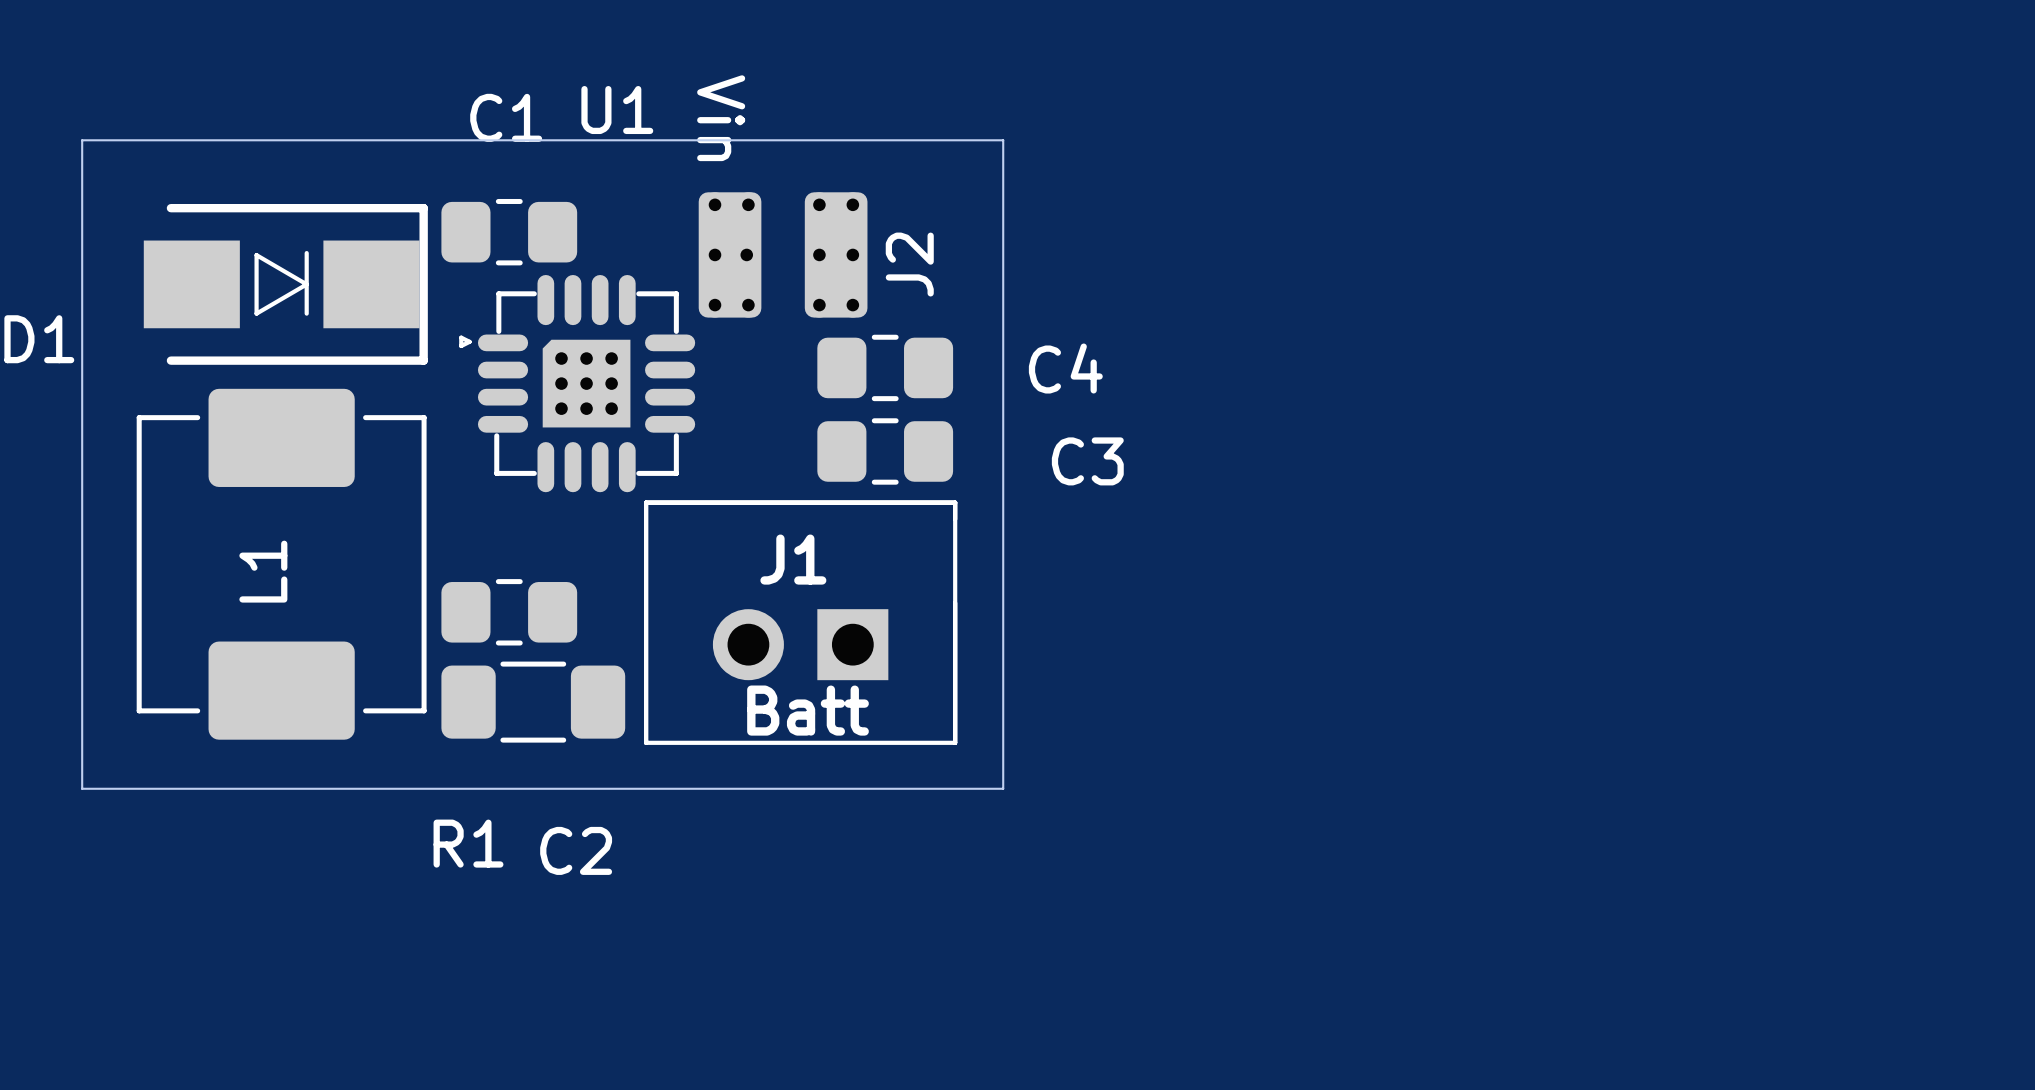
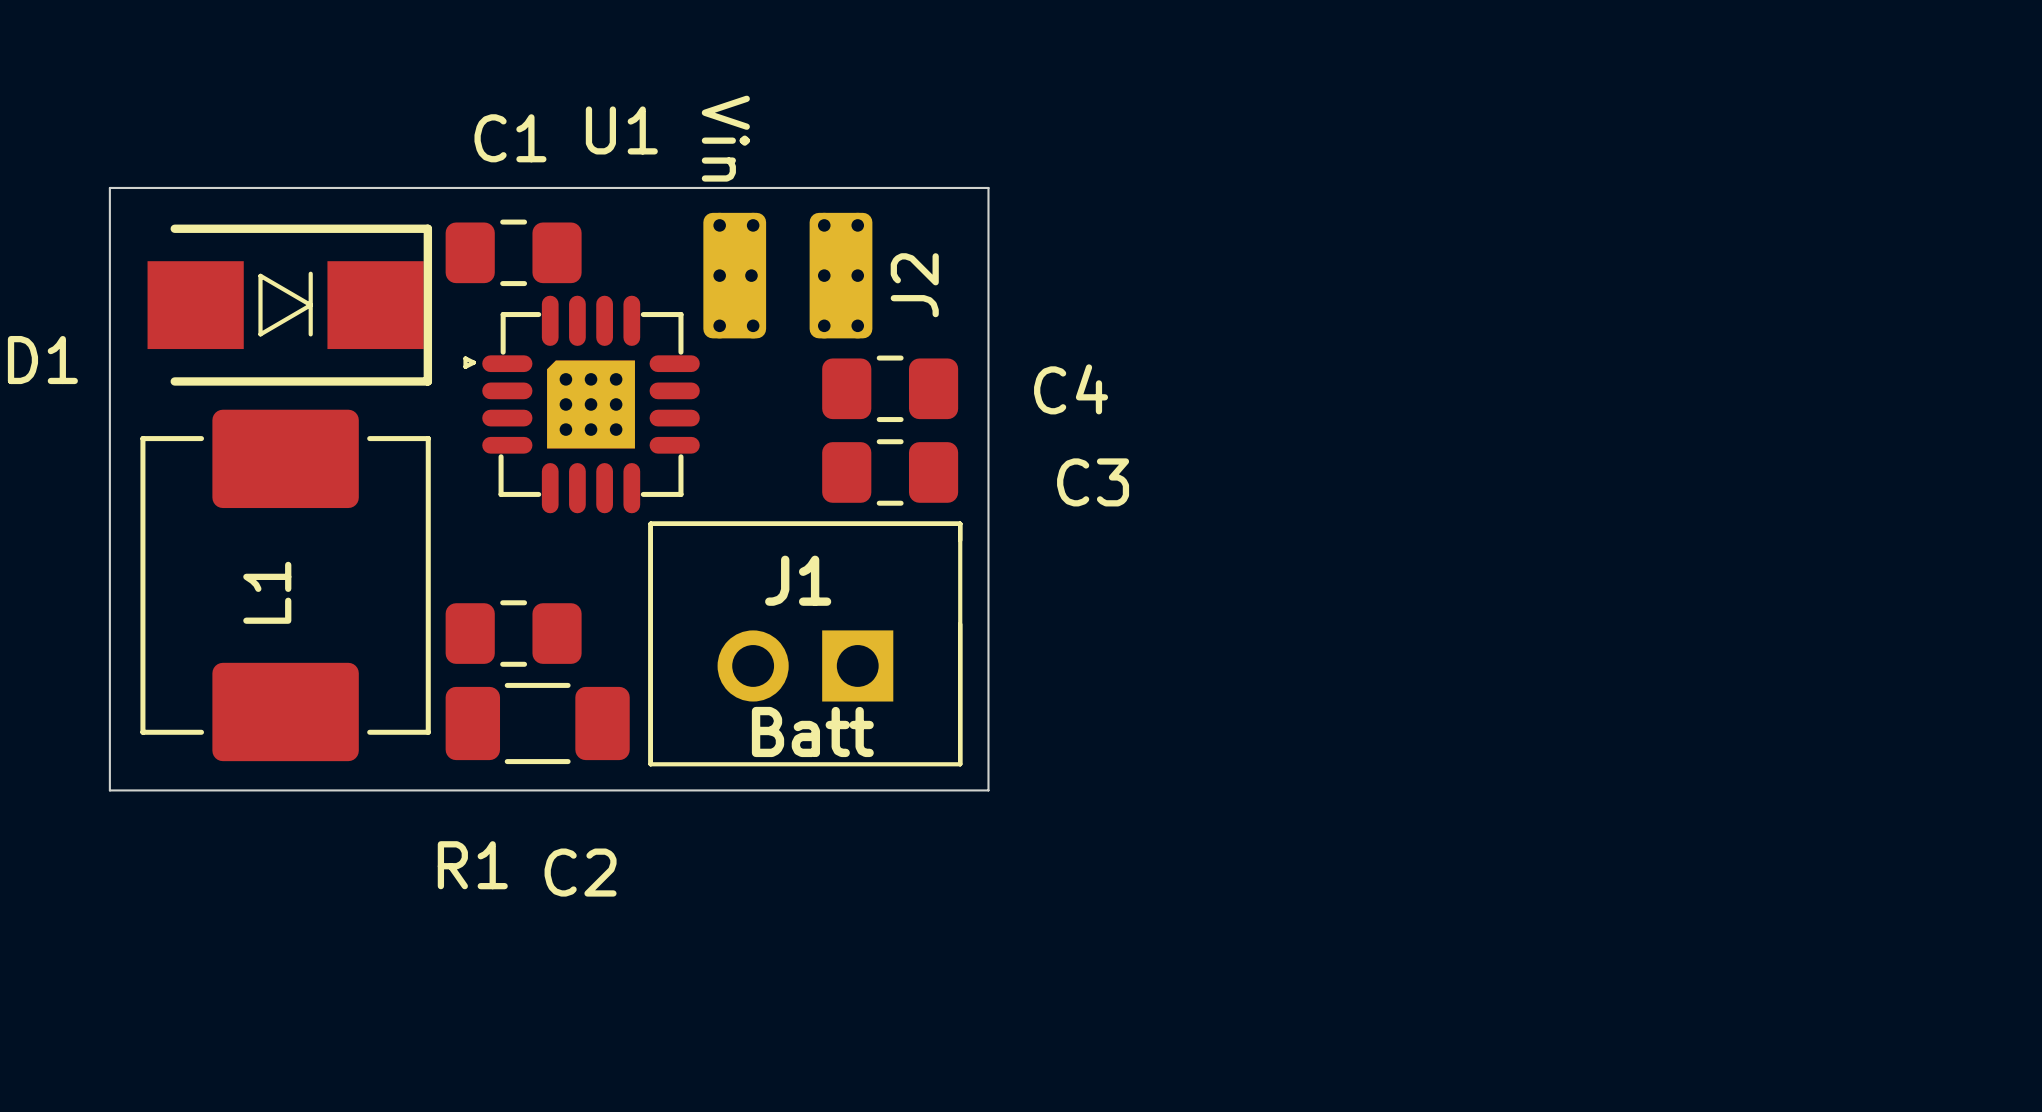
board edge: (82, 140) (1003, 140) (1003, 788) (82, 788) (82, 140) -> (109, 187) (109, 790) (988, 790) (988, 187) (109, 187)
U1 footprint: [459, 275, 696, 493] -> [463, 295, 700, 514]

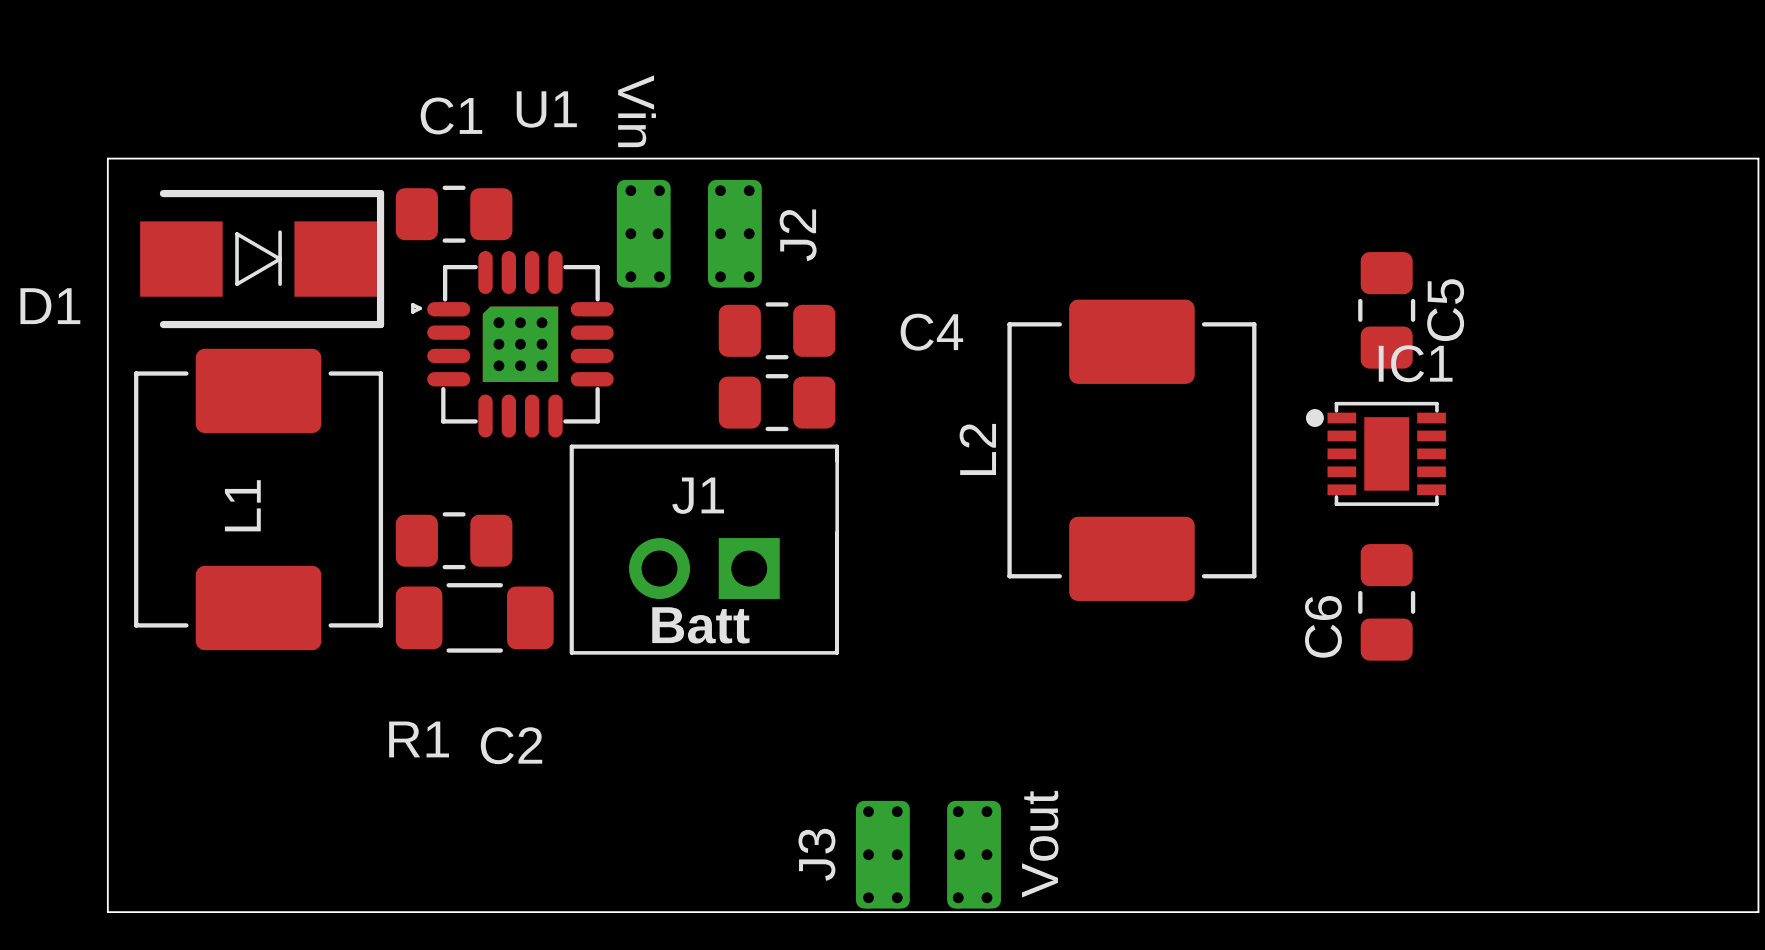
board edge: (988, 187) (988, 790) (109, 790) -> (861, 158) (1758, 158) (1758, 912) (107, 912) (107, 675)
C5: none -> (1386, 310)
C3 name: C3 (1093, 482) -> none
L2: none -> (1131, 450)
IC1: none -> (1375, 453)
C6: none -> (1386, 602)
J3: none -> (928, 854)

